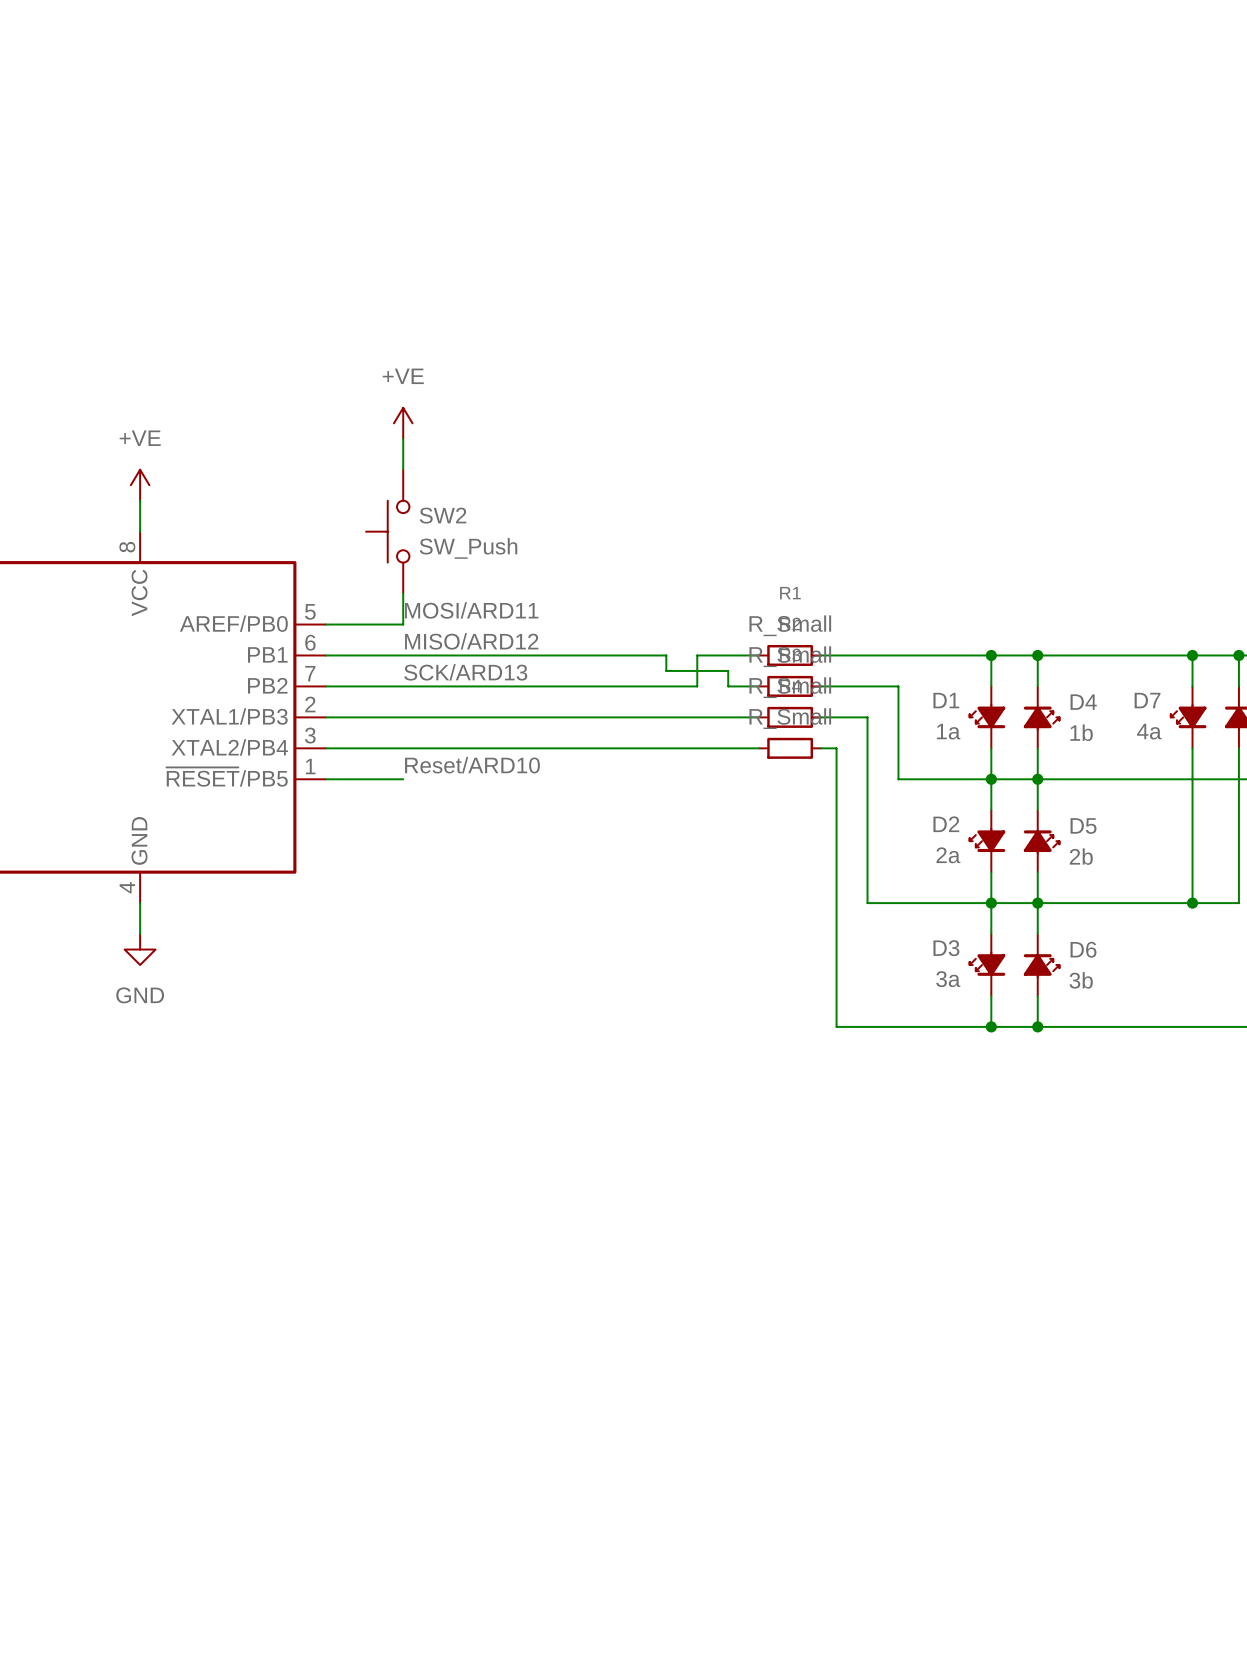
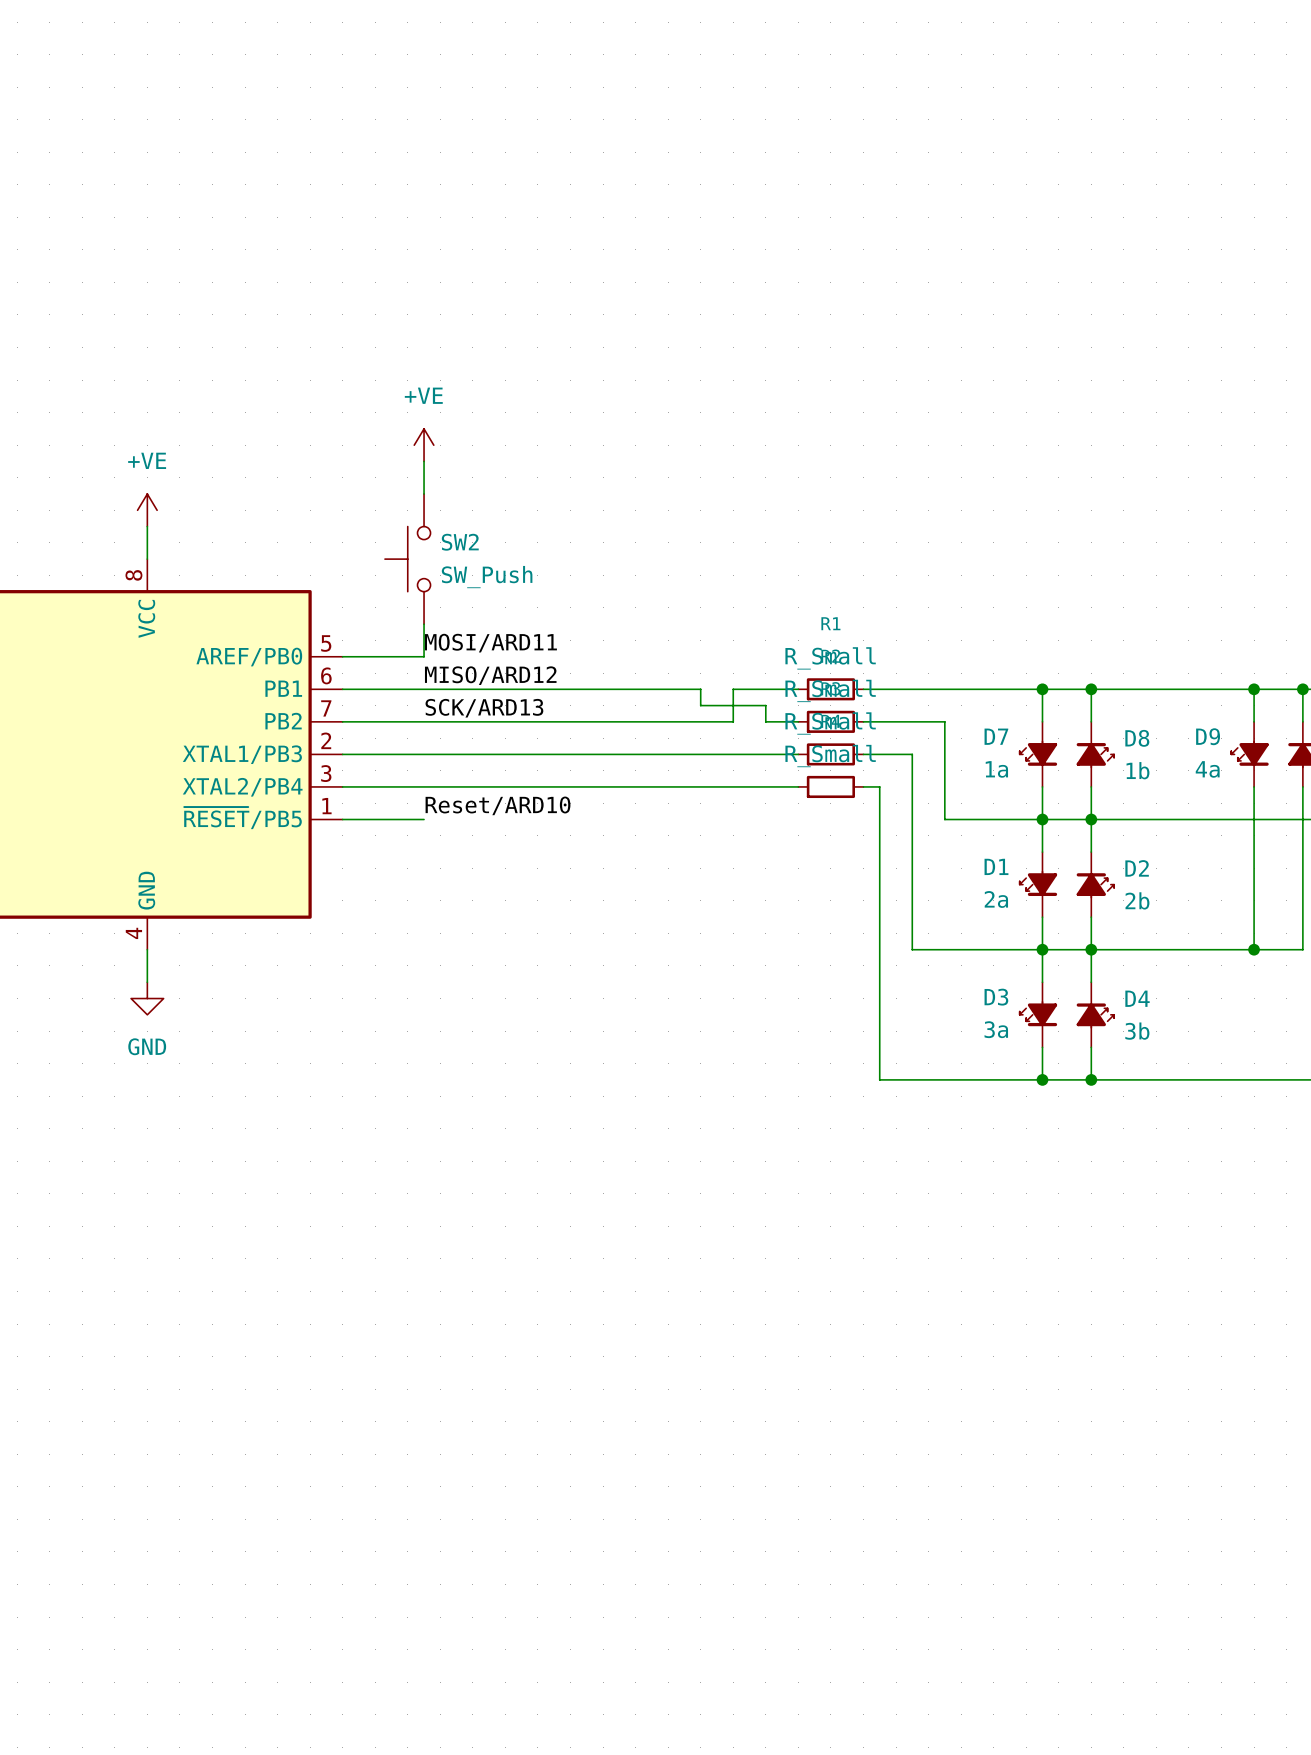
D1 name: D1 (946, 700) -> D7 (996, 736)
D7 name: D7 (1147, 700) -> D9 (1208, 736)
D4 name: D4 (1083, 702) -> D8 (1137, 738)
D2 name: D2 (946, 824) -> D1 (996, 866)
D5 name: D5 (1083, 826) -> D2 (1137, 868)
D6 name: D6 (1083, 949) -> D4 (1137, 998)

